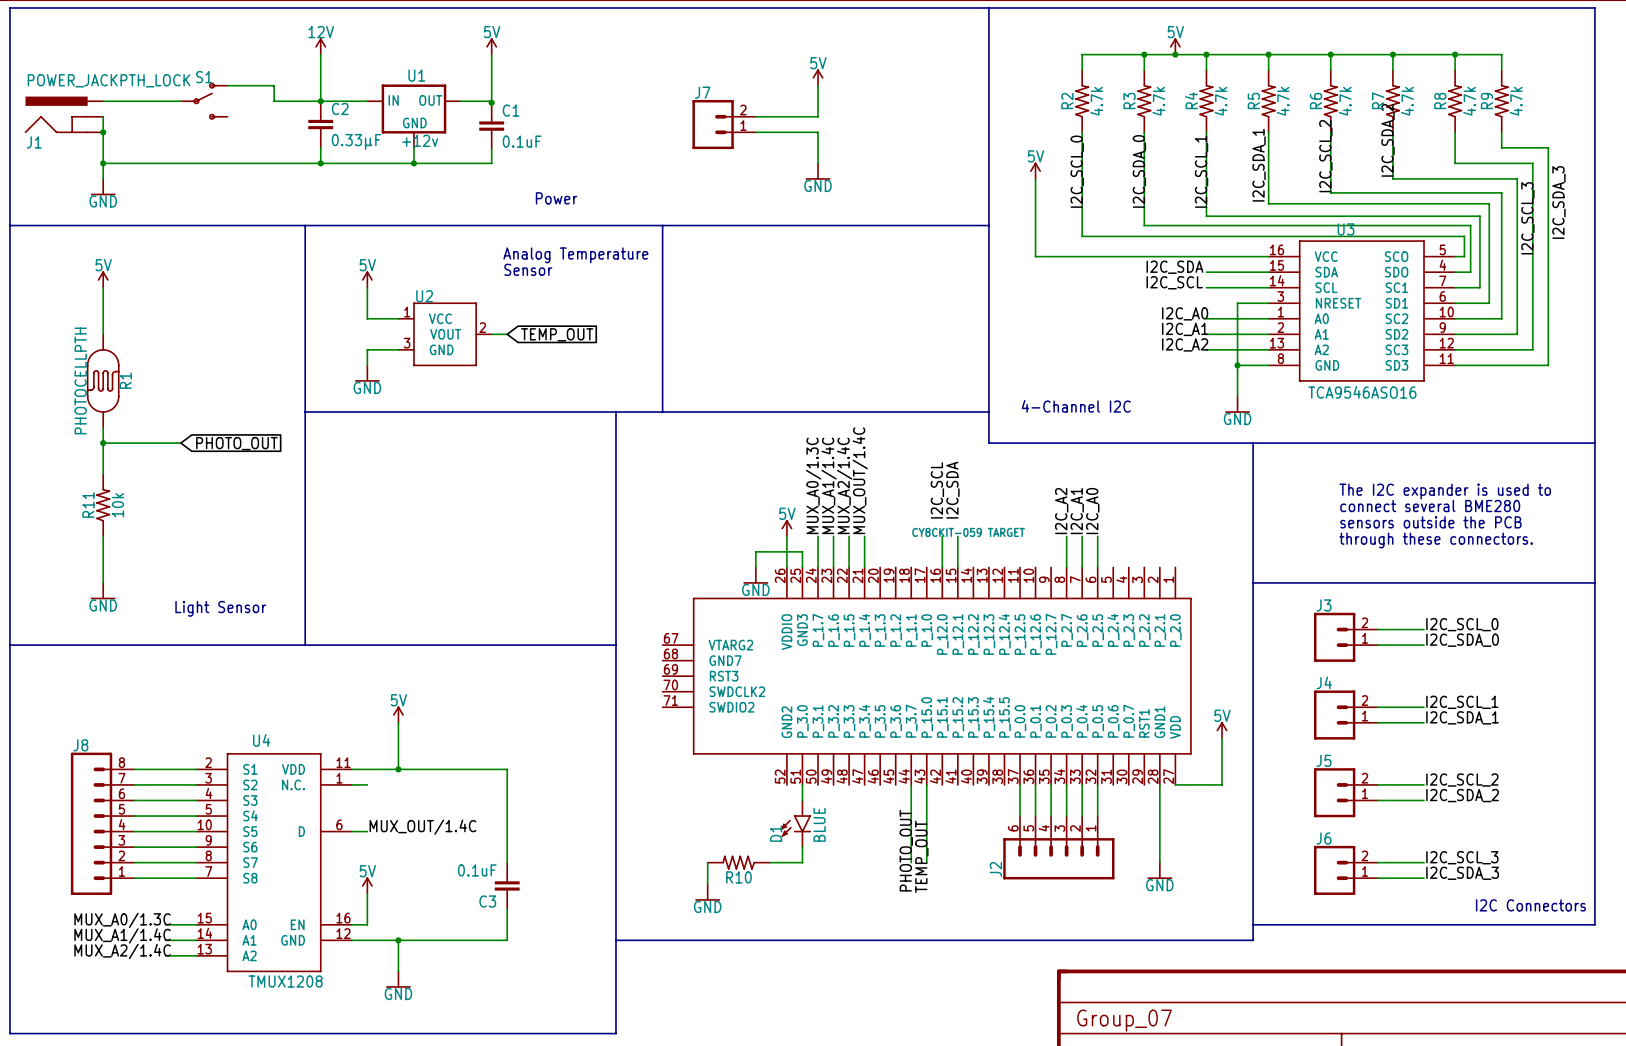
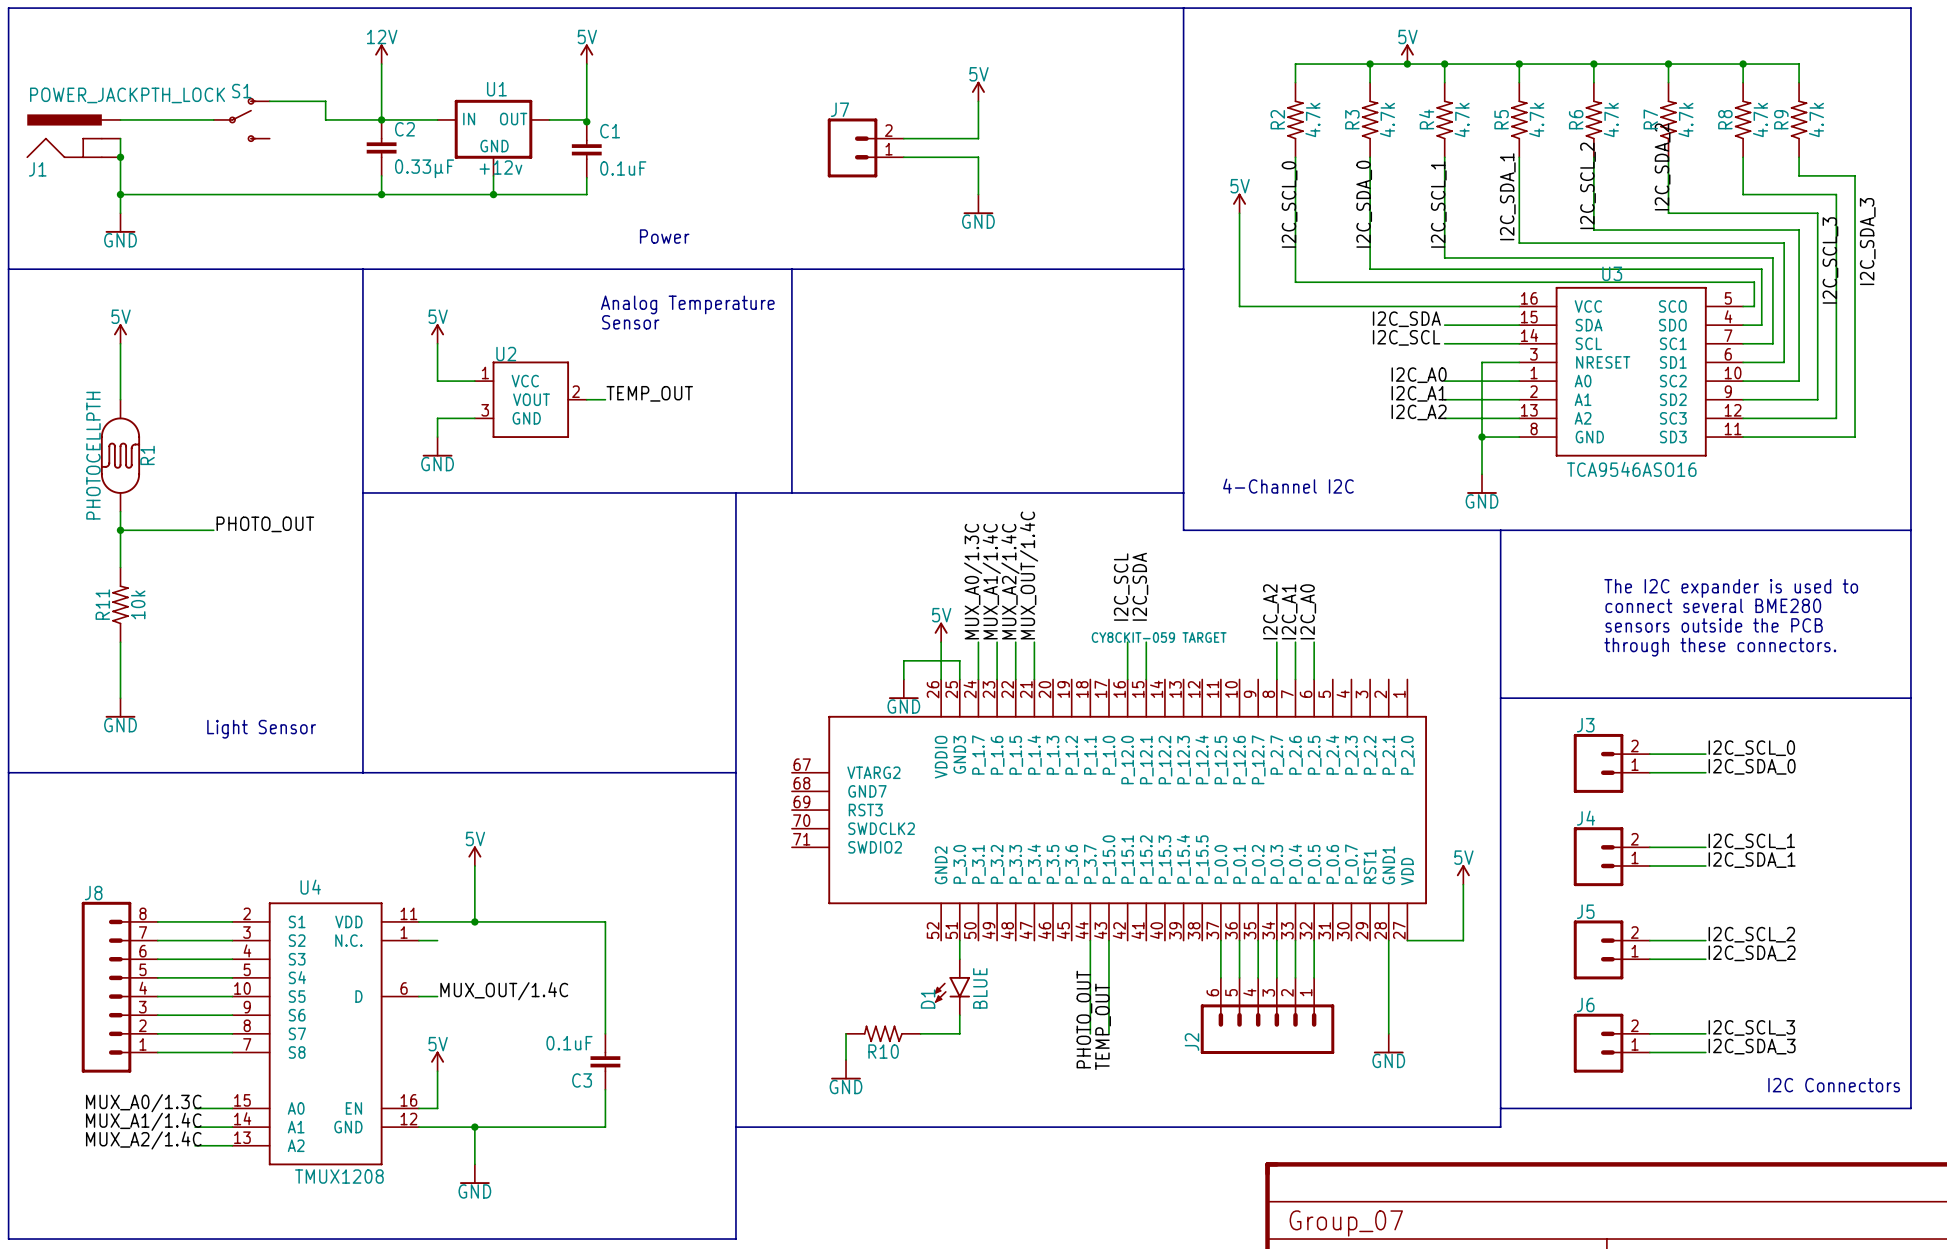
label: none -> TEMP_OUT (649, 393)
global label: TEMP_OUT (557, 334) -> none
label: none -> PHOTO_OUT (265, 524)
global label: PHOTO_OUT (236, 443) -> none

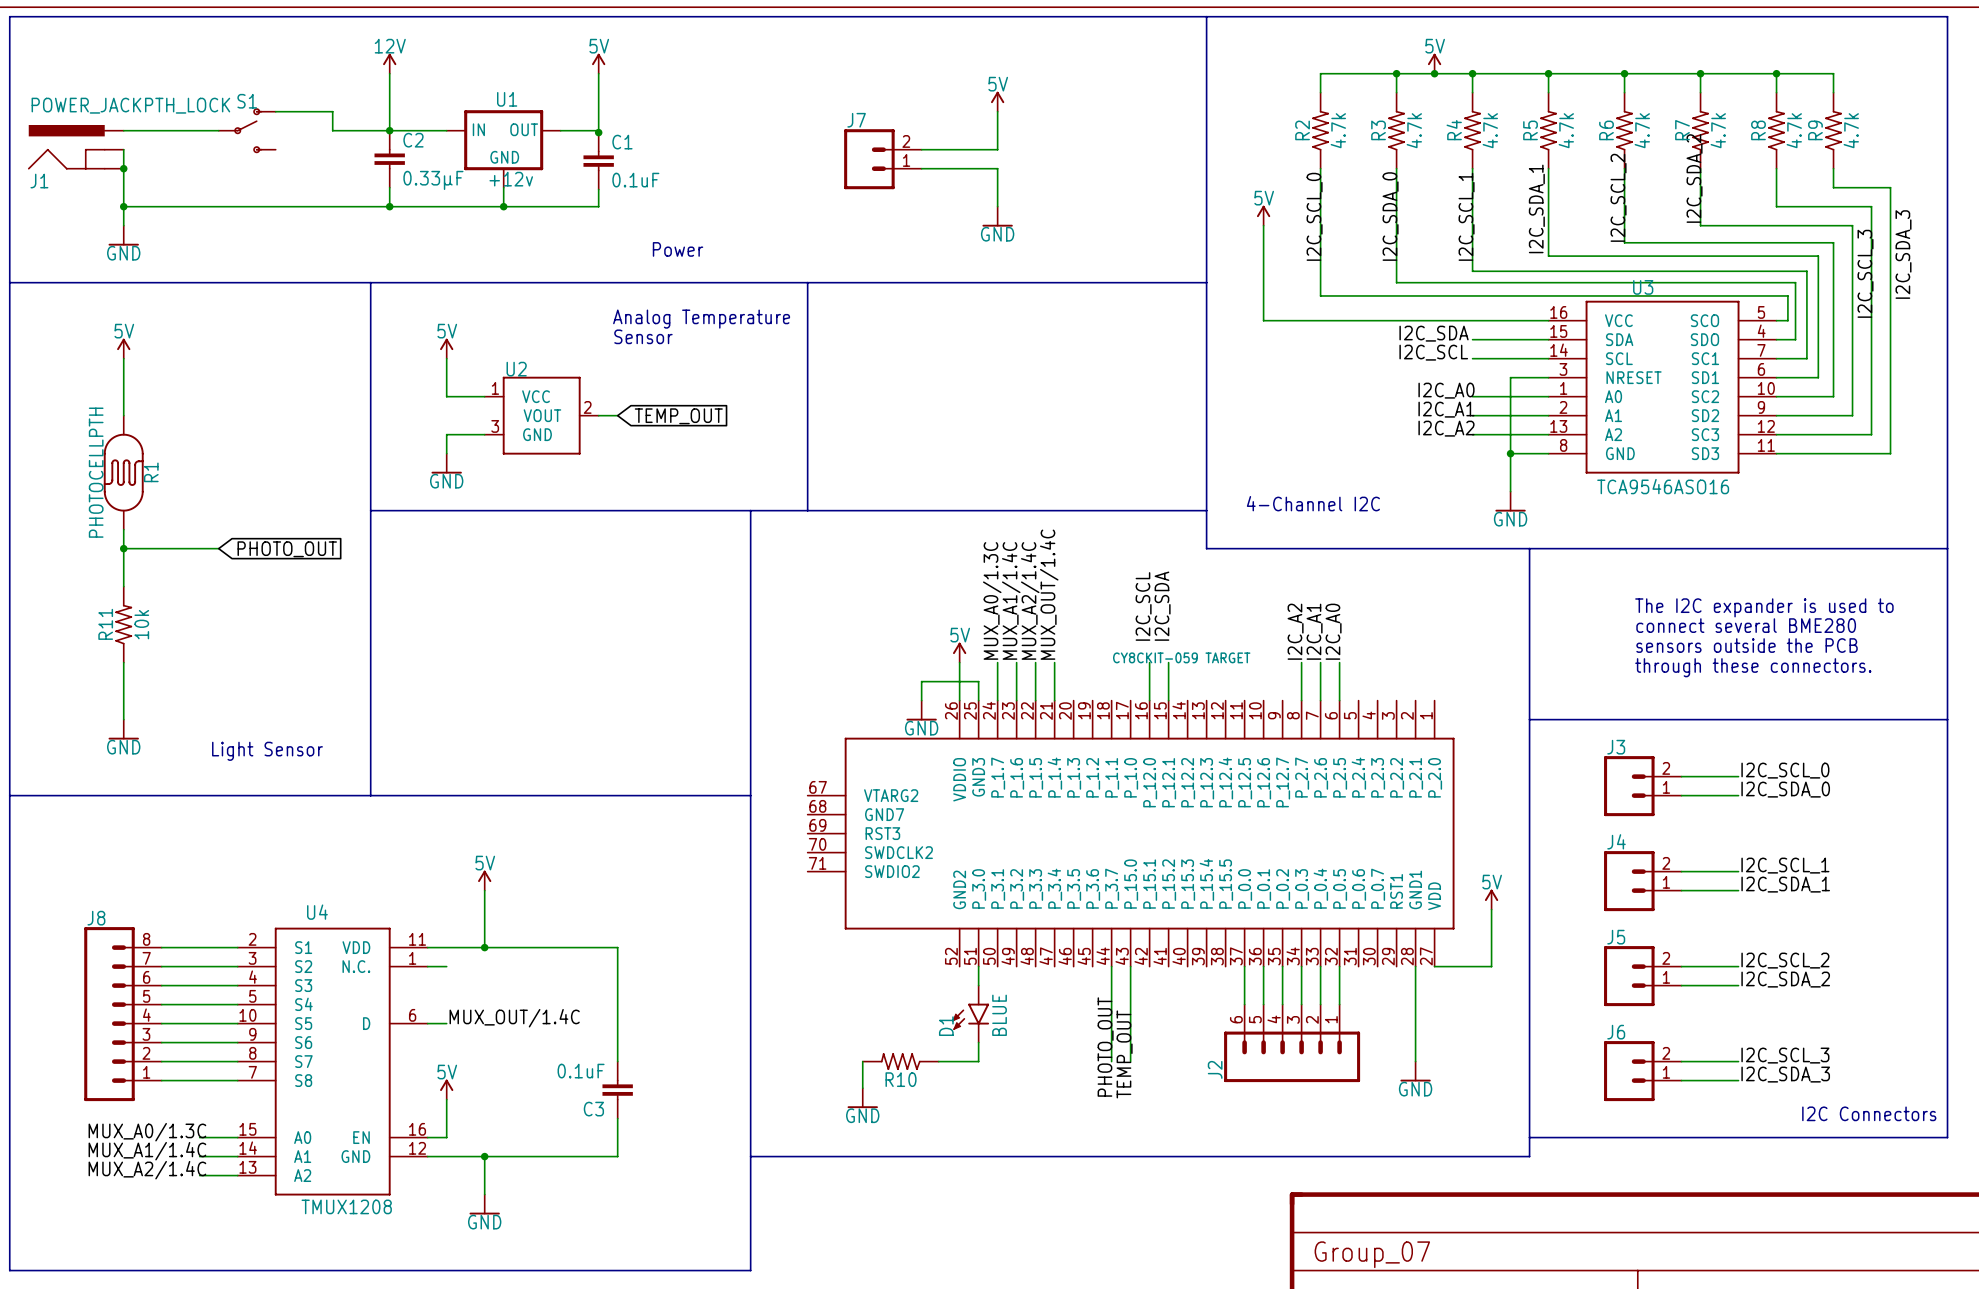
label: TEMP_OUT (649, 393) -> none
global label: none -> TEMP_OUT (678, 416)
label: PHOTO_OUT (265, 524) -> none
global label: none -> PHOTO_OUT (287, 549)

